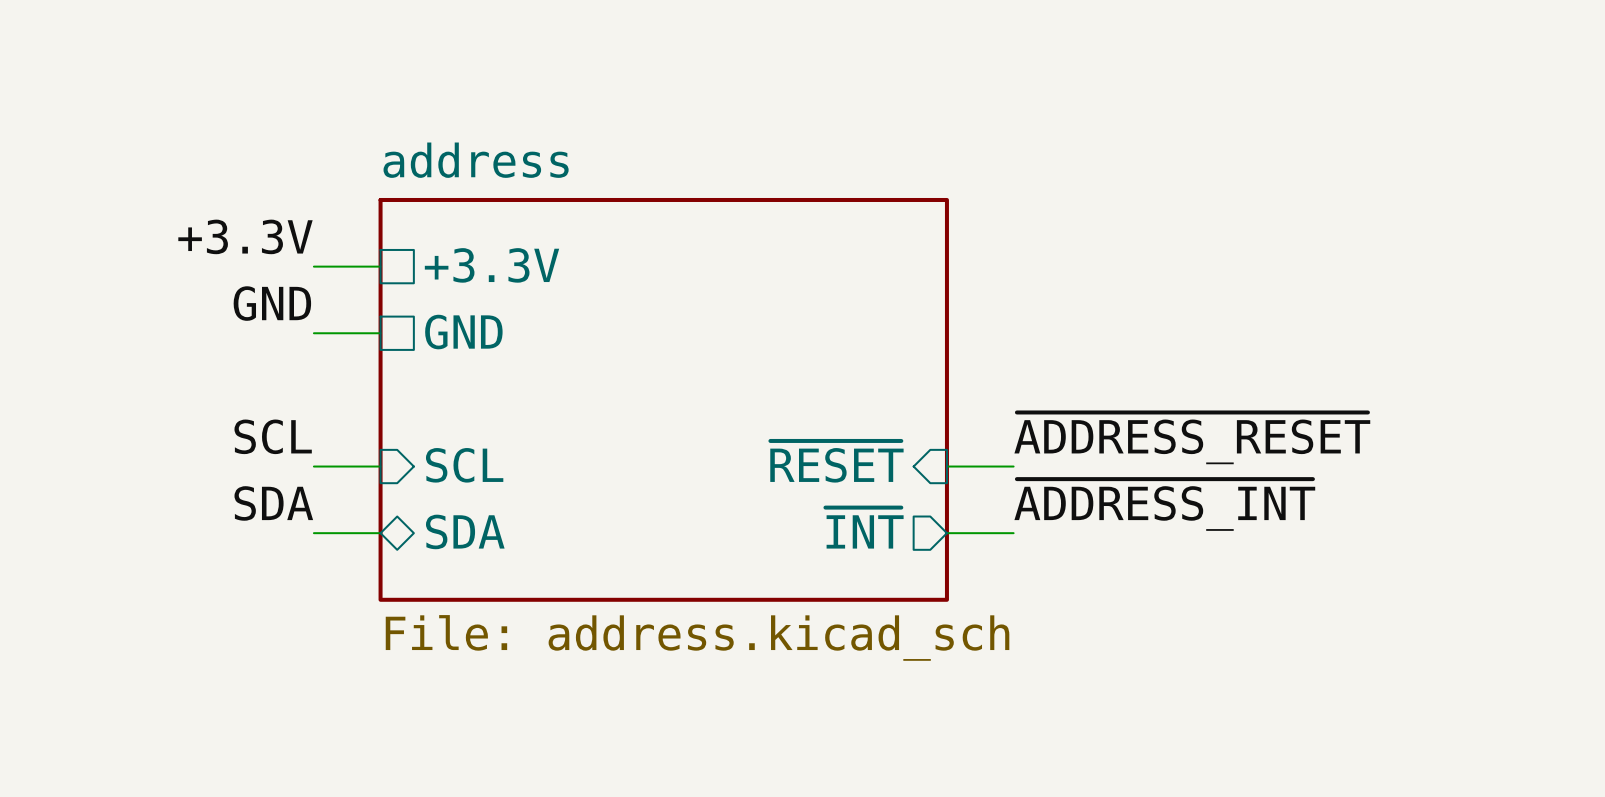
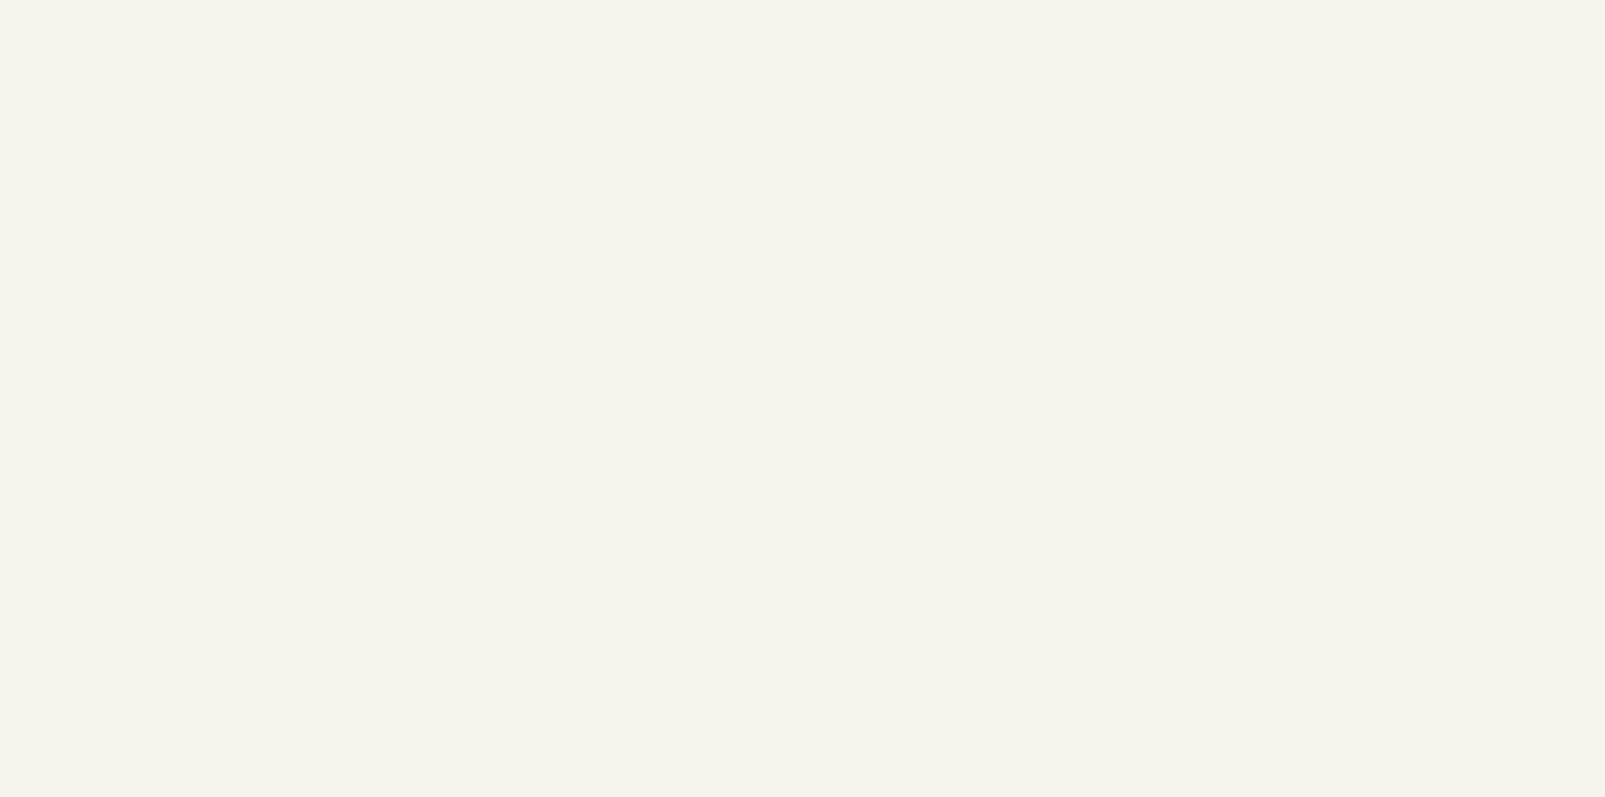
label: +3.3V (245, 236) -> none
sheet pin: +3.3V (492, 265) -> none
wire: (313, 266) (380, 266) -> none
label: GND (272, 303) -> none
sheet pin: GND (463, 332) -> none
wire: (313, 333) (380, 333) -> none
sheet address: File: address.kicad_sch (663, 399) -> none
label: SCL (273, 436) -> none
label: ~{ADDRESS_RESET} (1192, 438) -> none
sheet pin: ~{RESET} (836, 461) -> none
sheet pin: SCL (464, 465) -> none
wire: (313, 466) (380, 466) -> none
wire: (946, 466) (1013, 466) -> none
label: SDA (273, 503) -> none
label: ~{ADDRESS_INT} (1164, 504) -> none
sheet pin: ~{INT} (864, 528) -> none
sheet pin: SDA (465, 531) -> none
wire: (313, 533) (380, 533) -> none
wire: (946, 533) (1013, 533) -> none

